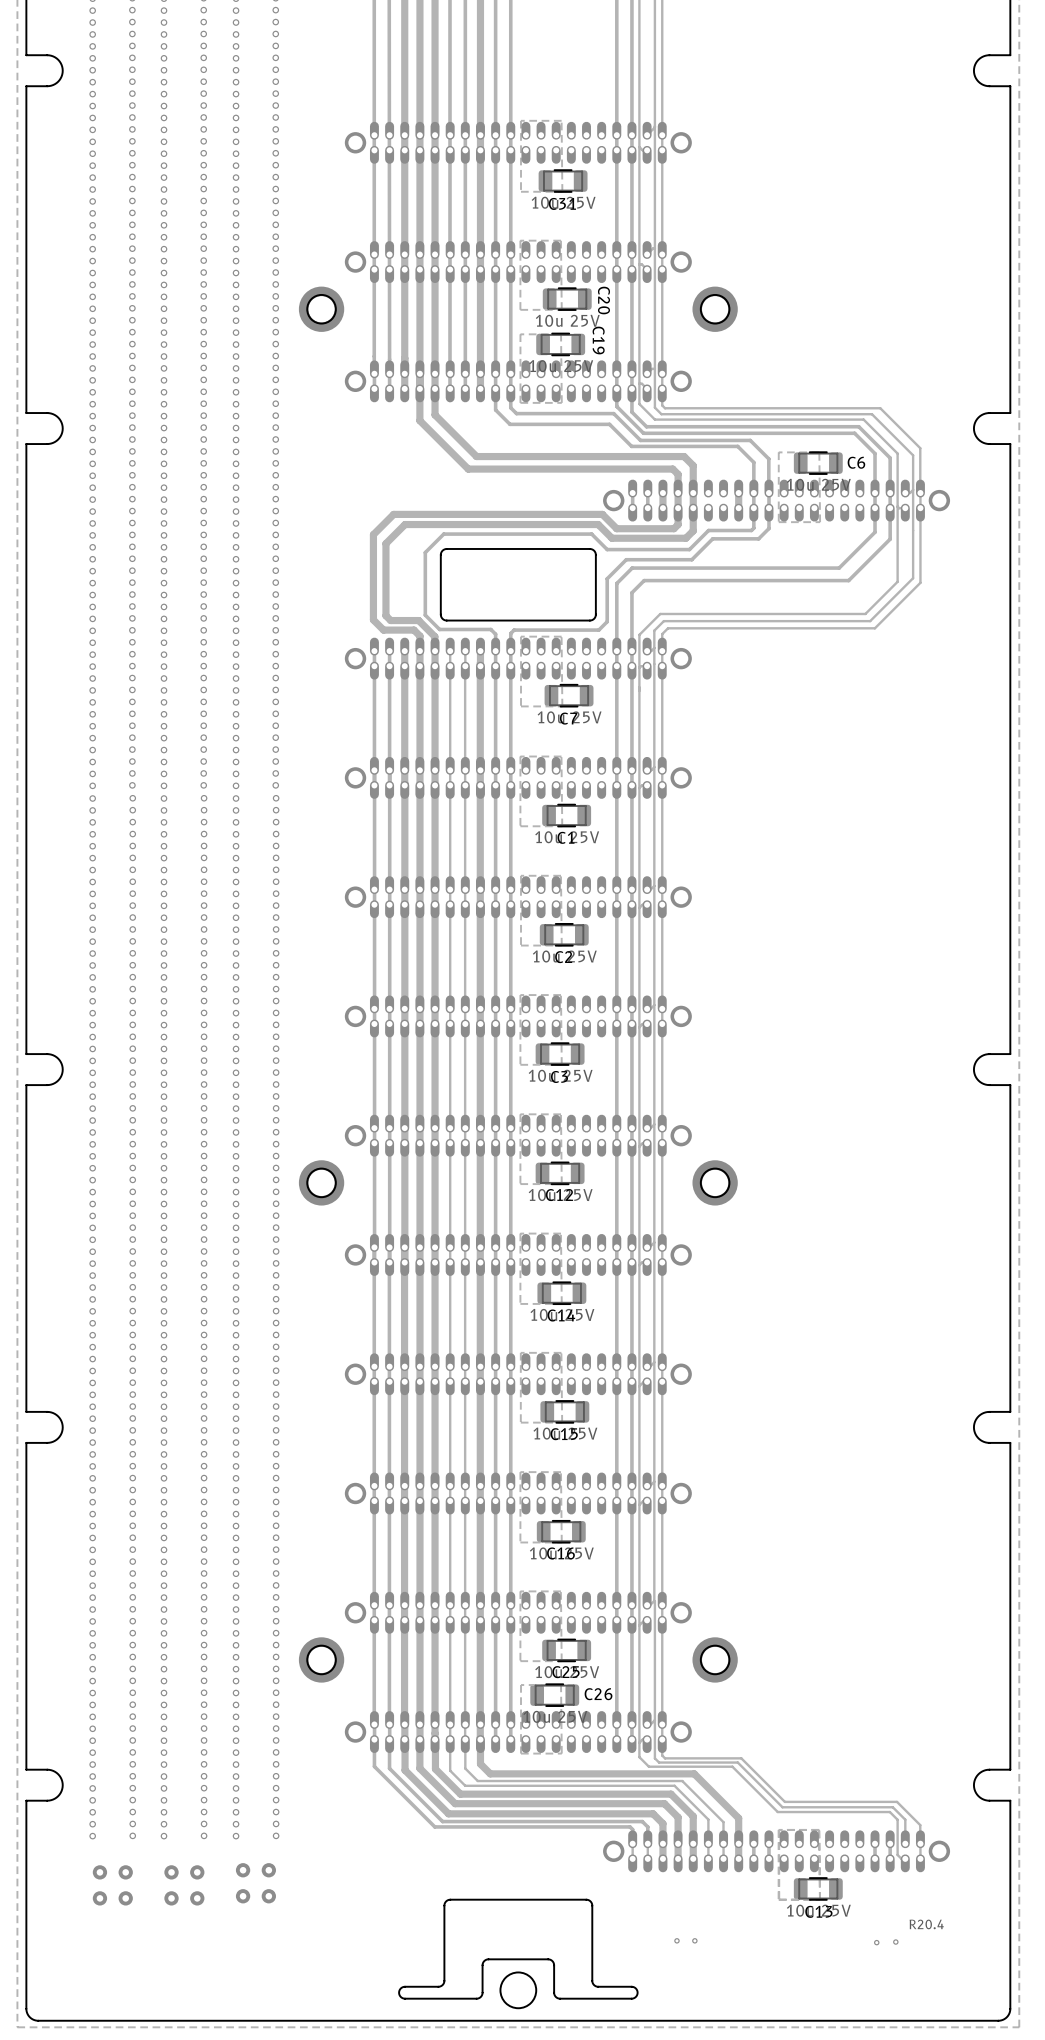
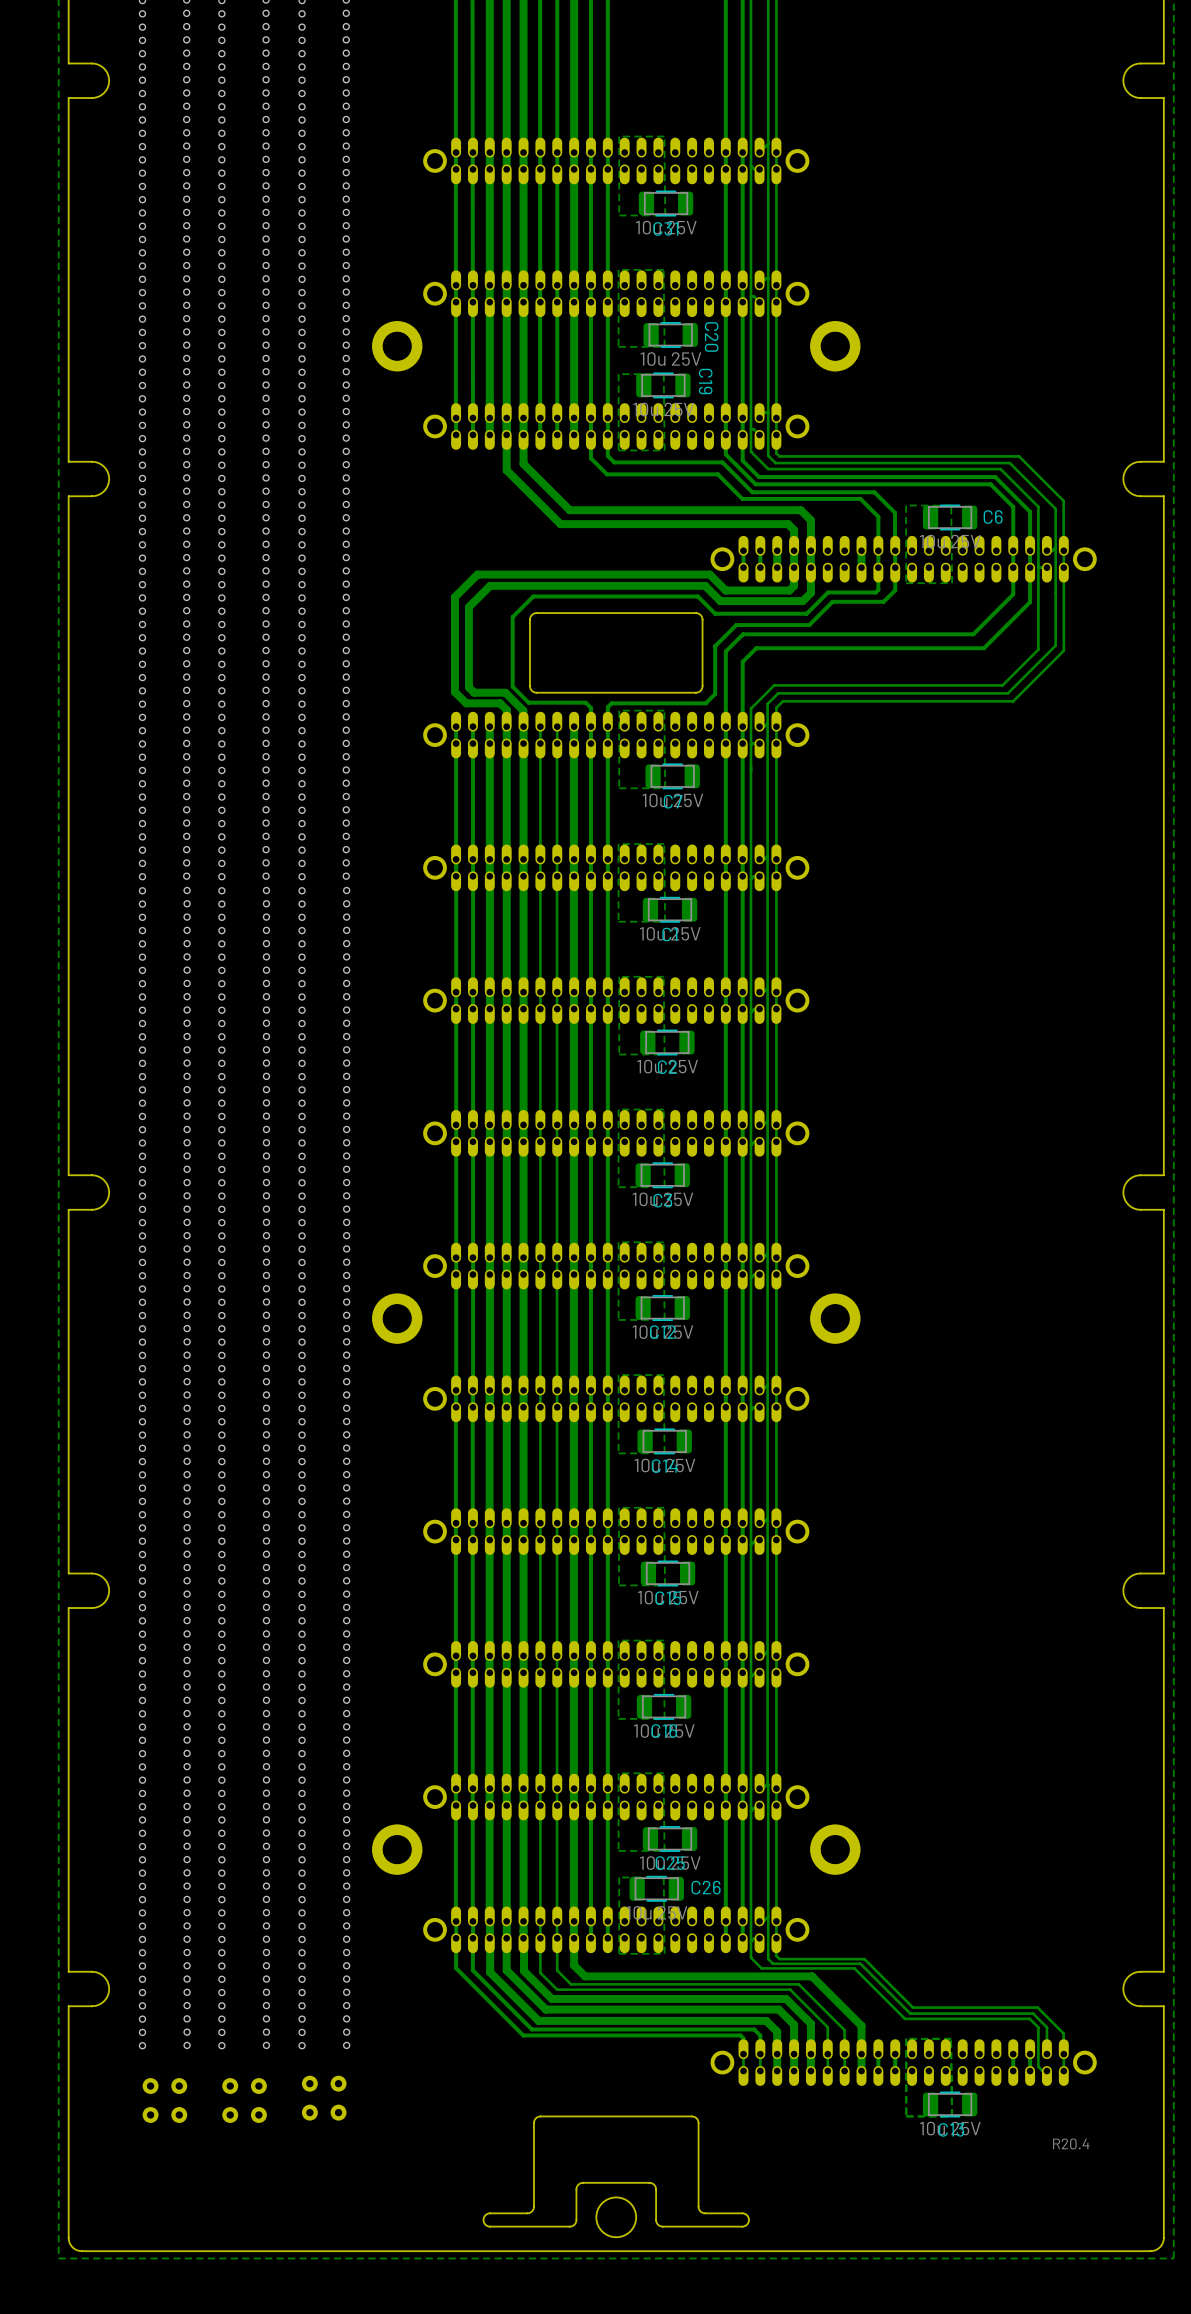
via: (676, 1940) -> none
via: (694, 1940) -> none
via: (876, 1942) -> none
via: (895, 1942) -> none

